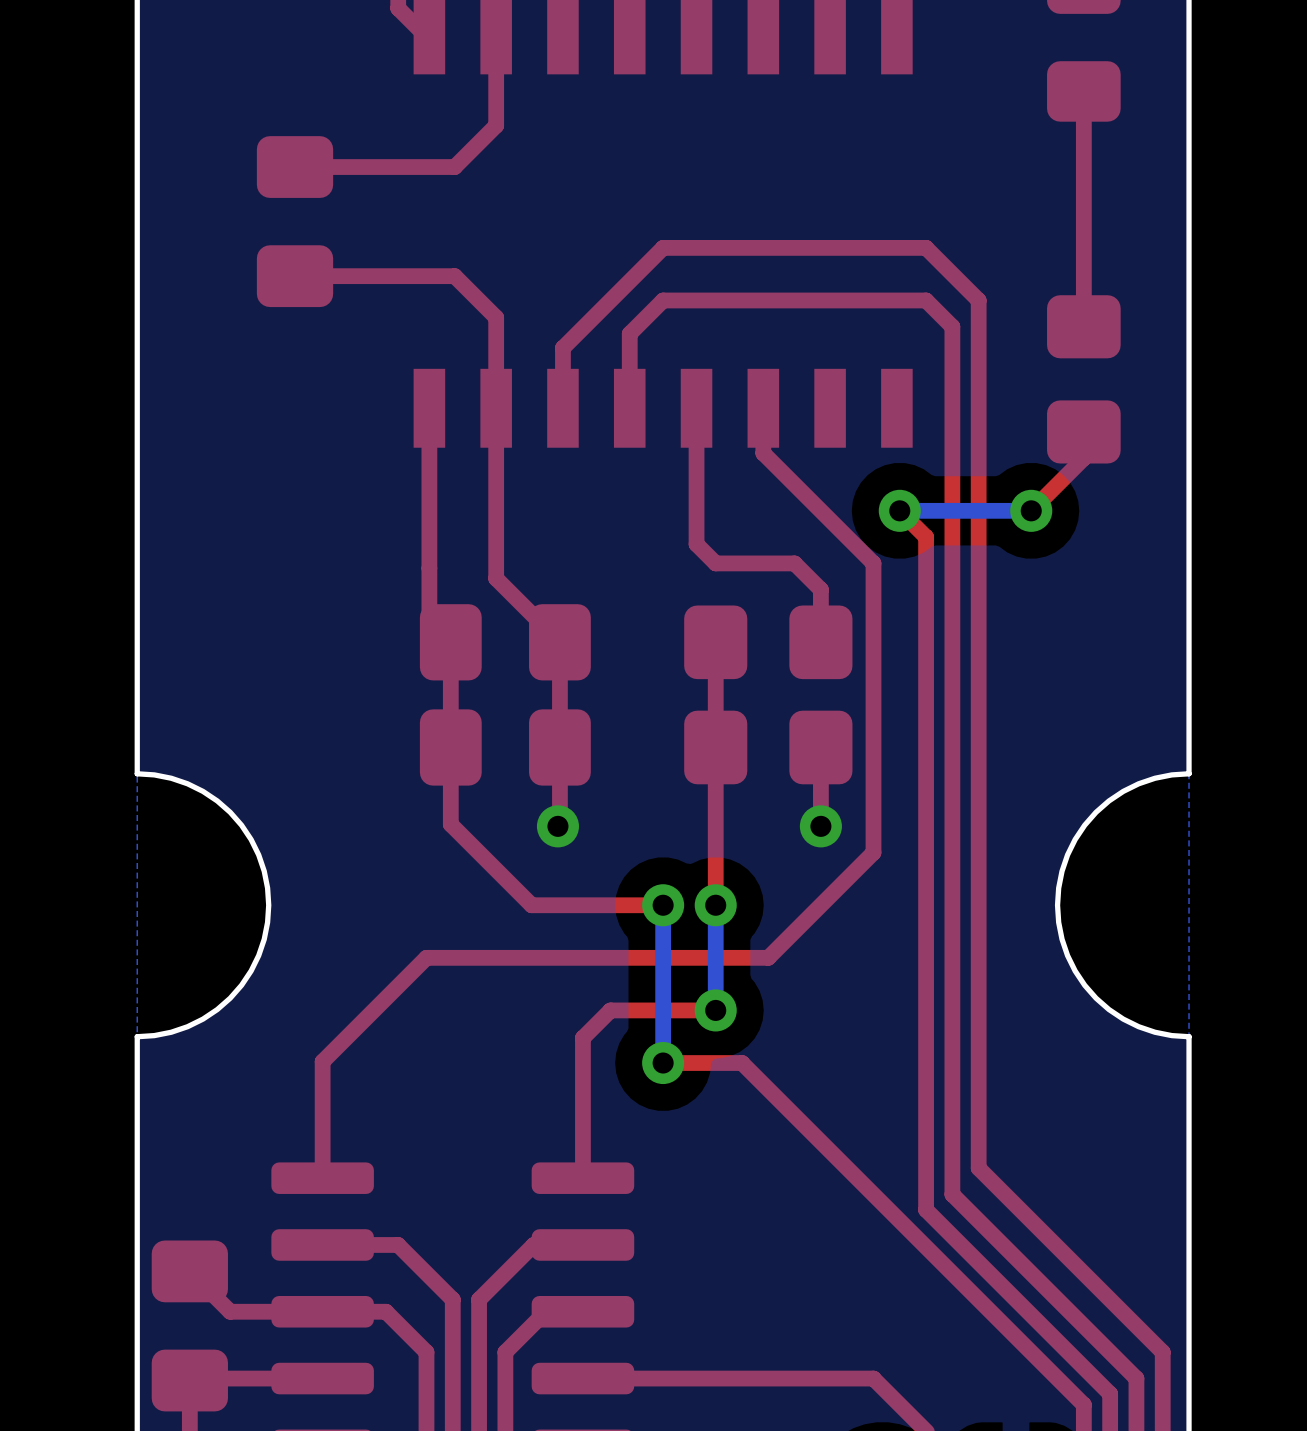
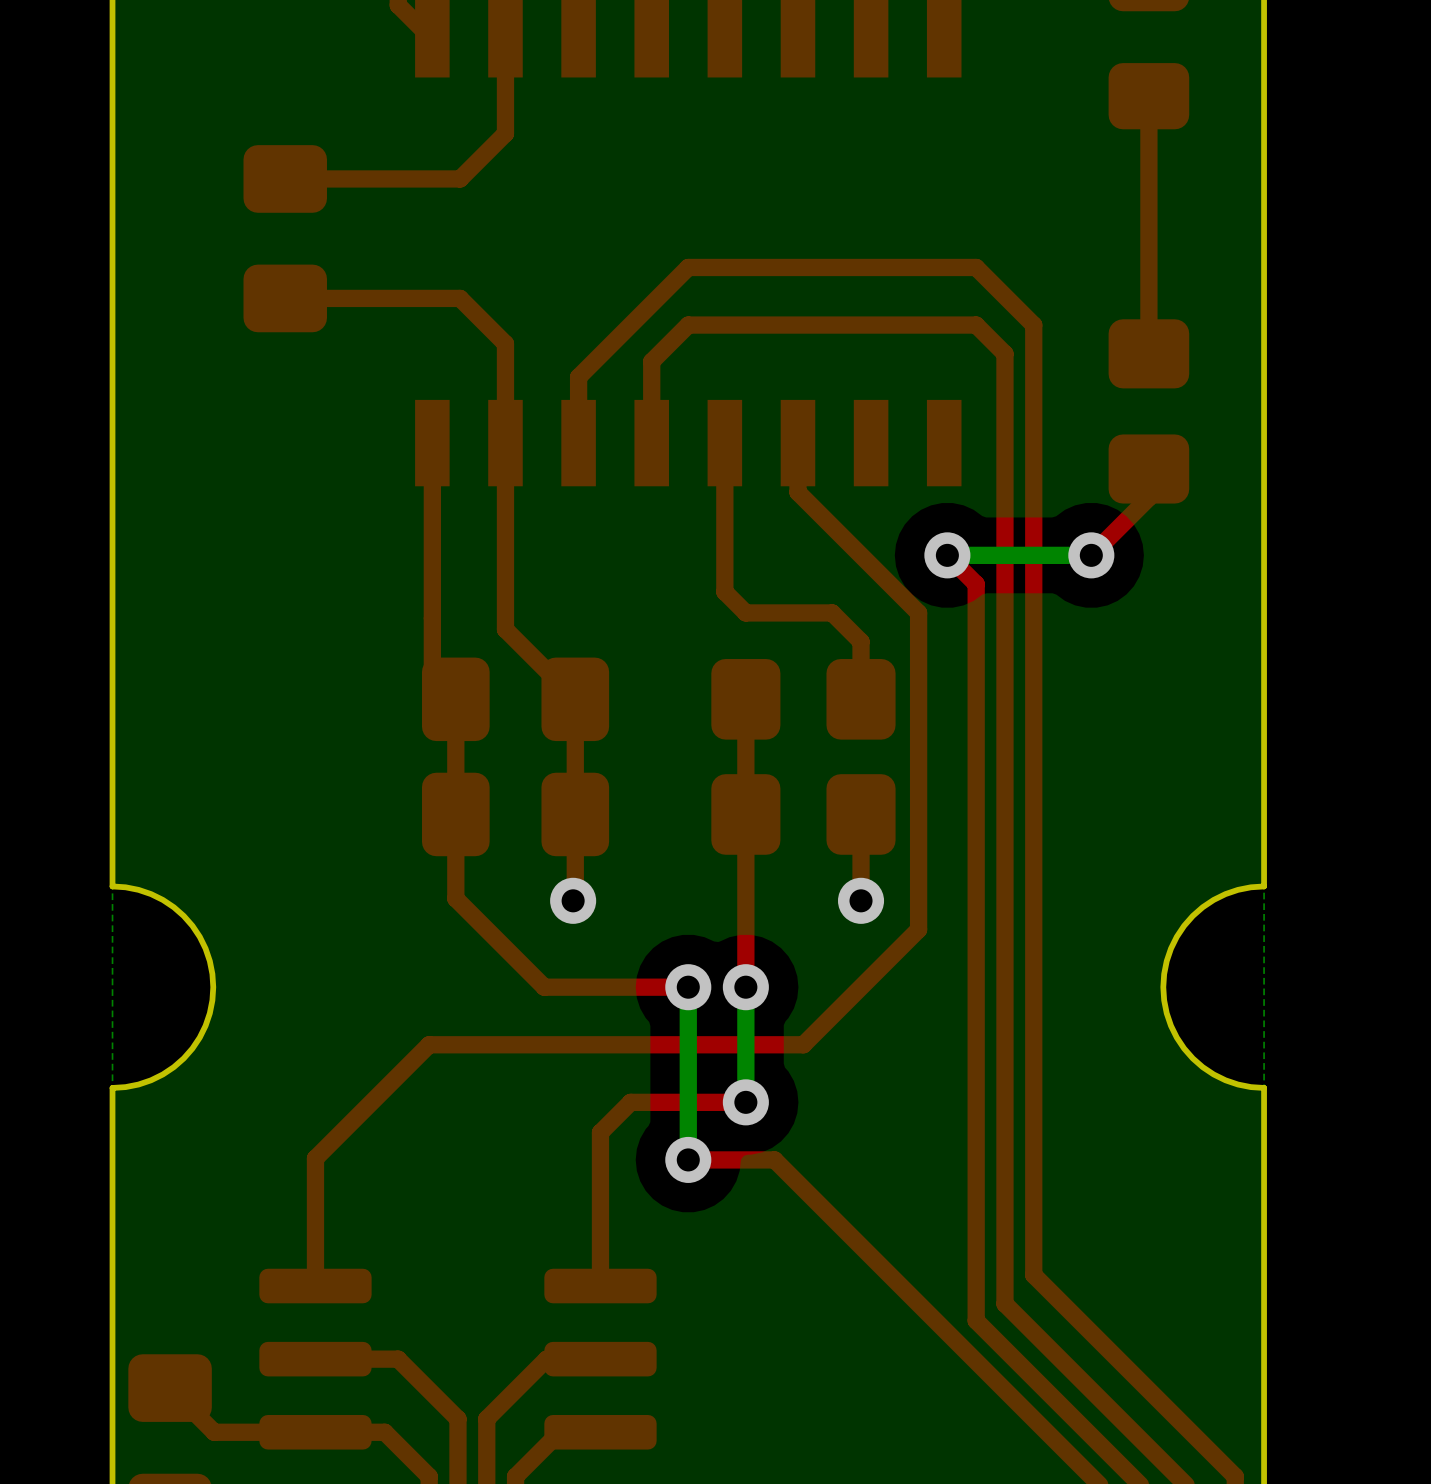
board edge: (137, 773) (154, 774) (187, 783) (217, 800) (230, 812) (251, 839) (258, 854) (267, 888) (268, 905) (267, 922) (258, 955) (251, 970) (230, 998) (217, 1009) (187, 1026) (154, 1035) (137, 1036) -> (112, 843) (112, 886) (138, 889) (151, 894) (173, 907) (183, 915) (192, 925) (205, 948) (212, 974) (213, 987) (212, 1000) (205, 1025) (192, 1048) (183, 1058) (173, 1067) (151, 1080) (138, 1084) (112, 1087) (112, 1131)
board edge: (1189, 773) (1171, 774) (1138, 783) (1108, 800) (1096, 812) (1084, 825) (1067, 854) (1058, 888) (1057, 905) (1058, 922) (1067, 955) (1084, 985) (1096, 998) (1108, 1009) (1138, 1026) (1171, 1035) (1189, 1036) -> (1264, 843) (1264, 886) (1237, 889) (1225, 894) (1202, 907) (1192, 915) (1184, 925) (1170, 948) (1166, 961) (1163, 987) (1166, 1013) (1170, 1025) (1184, 1048) (1192, 1058) (1202, 1067) (1225, 1080) (1237, 1084) (1264, 1087) (1264, 1131)

